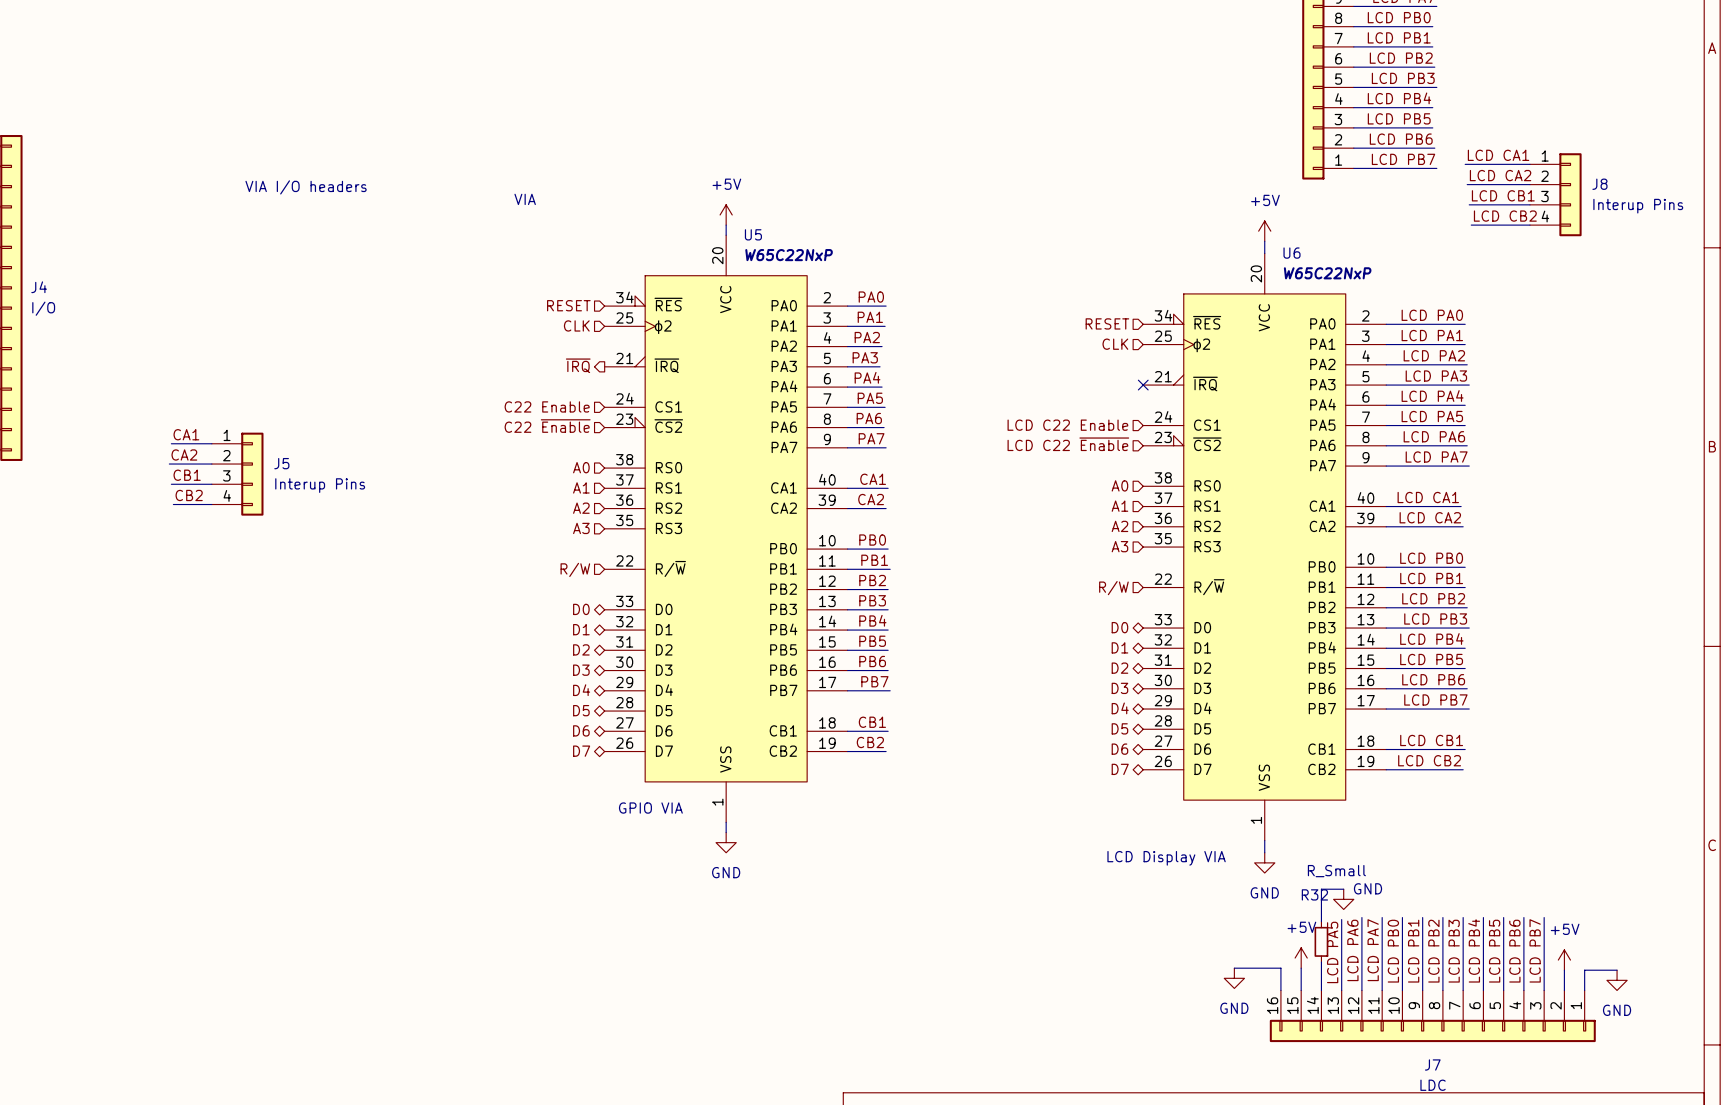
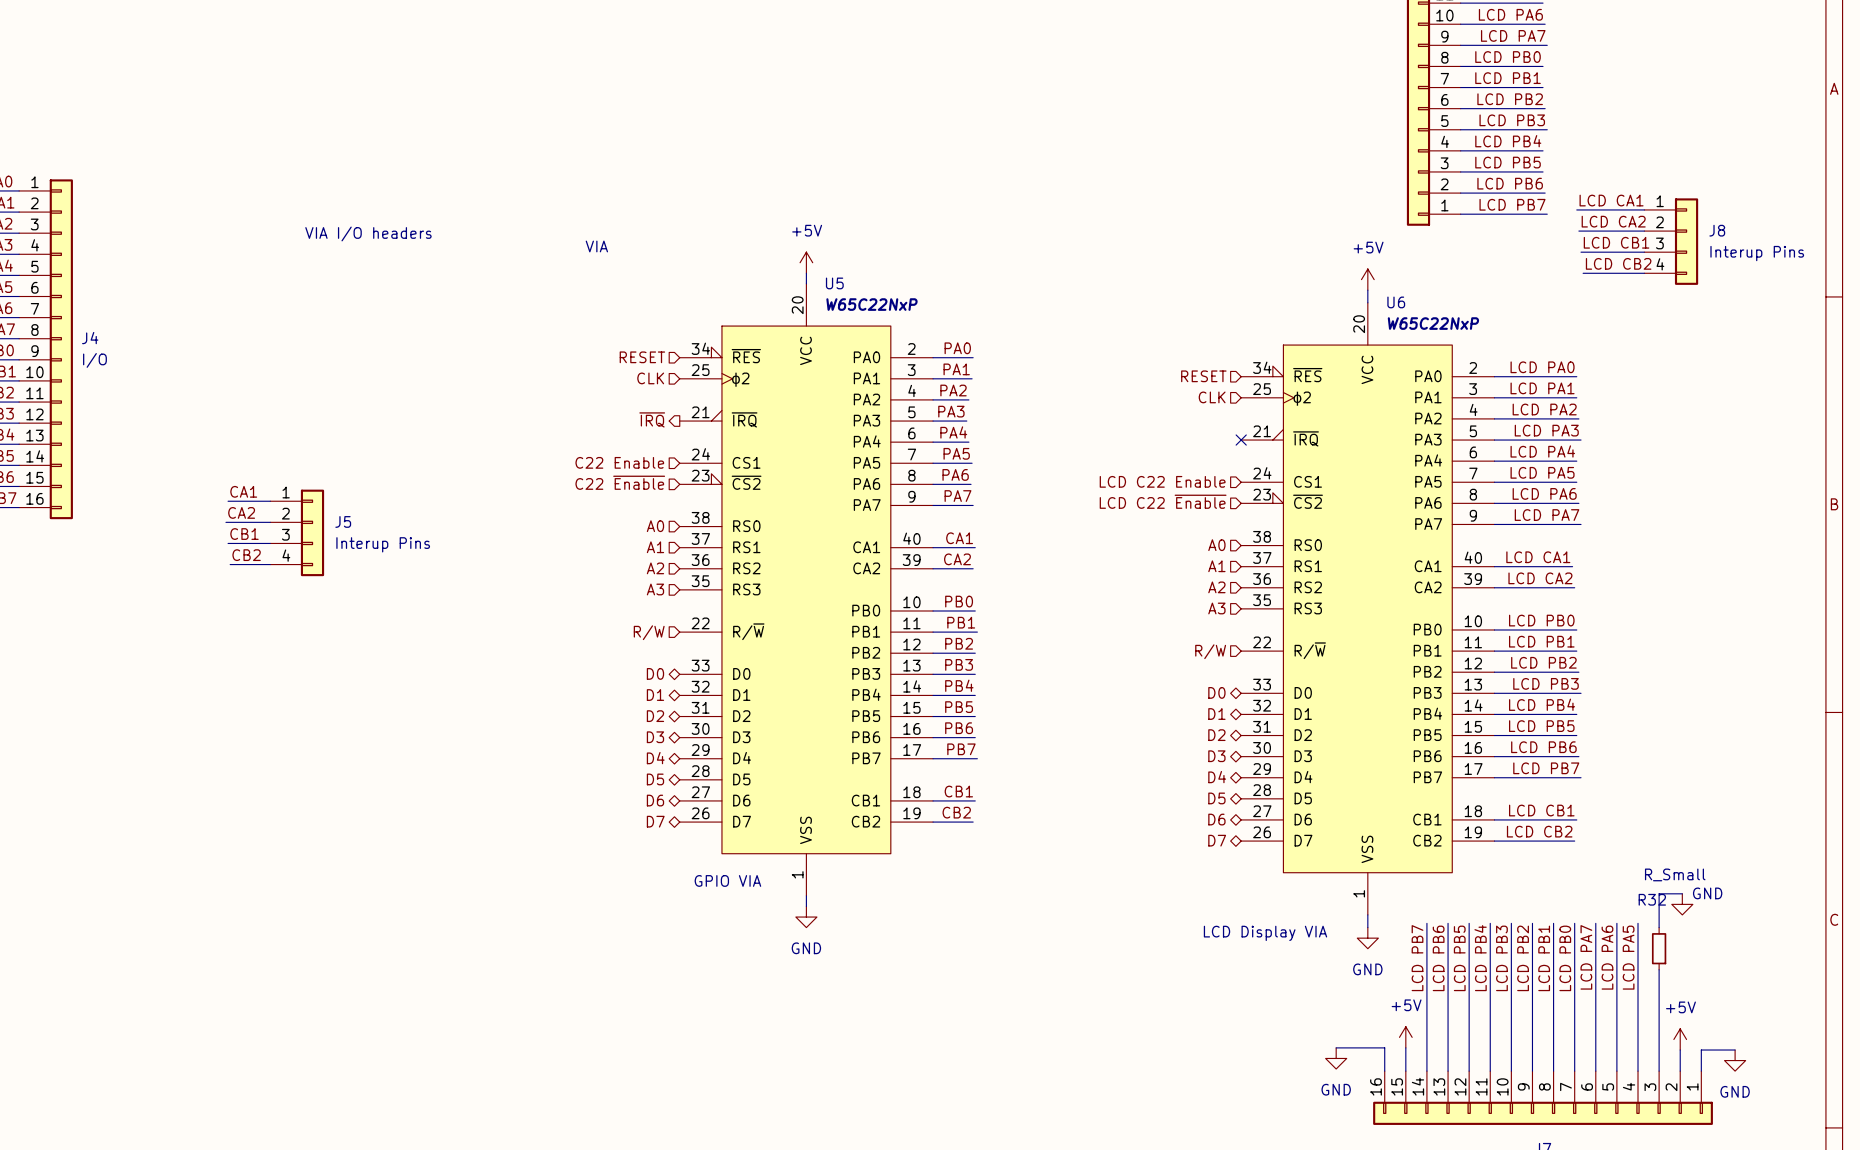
wire: none -> (1682, 893) (1659, 893) (1659, 927)
power symbol: none -> GND (1682, 904)
wire: none -> (1448, 923) (1448, 997)
wire: none -> (1469, 923) (1469, 995)
wire: none -> (1490, 923) (1490, 995)
wire: none -> (1511, 923) (1511, 995)
wire: none -> (1532, 923) (1532, 995)
wire: none -> (1553, 923) (1553, 995)
wire: none -> (1574, 923) (1574, 995)
wire: none -> (1595, 923) (1595, 995)
wire: none -> (1616, 923) (1616, 995)
wire: none -> (1638, 923) (1638, 995)
label: none -> LCD PB7 (1417, 958)
wire: (1321, 889) (1343, 889) -> (1426, 965) (1426, 923)
wire: none -> (1659, 969) (1659, 995)
power symbol: GND (1343, 899) -> none
wire: none -> (1426, 999) (1426, 1041)
R32 position: (1321, 941) -> (1659, 948)
label position: LCD PA6 (1352, 950) -> LCD PA6 (1607, 957)
label position: LCD PA7 (1373, 950) -> LCD PA7 (1586, 957)
label position: LCD PB4 (1474, 950) -> LCD PB4 (1480, 958)
label: LCD PB7 (1535, 950) -> none
label position: LCD PB0 (1393, 951) -> LCD PB0 (1565, 958)
label position: LCD PB1 (1413, 951) -> LCD PB1 (1544, 958)
label position: LCD PB2 (1433, 951) -> LCD PB2 (1523, 958)
label position: LCD PB3 (1454, 951) -> LCD PB3 (1501, 958)
label position: LCD PB5 (1494, 951) -> LCD PB5 (1459, 958)
label position: LCD PB6 (1514, 951) -> LCD PB6 (1438, 958)
label position: LCD PA5 (1332, 952) -> LCD PA5 (1628, 957)

